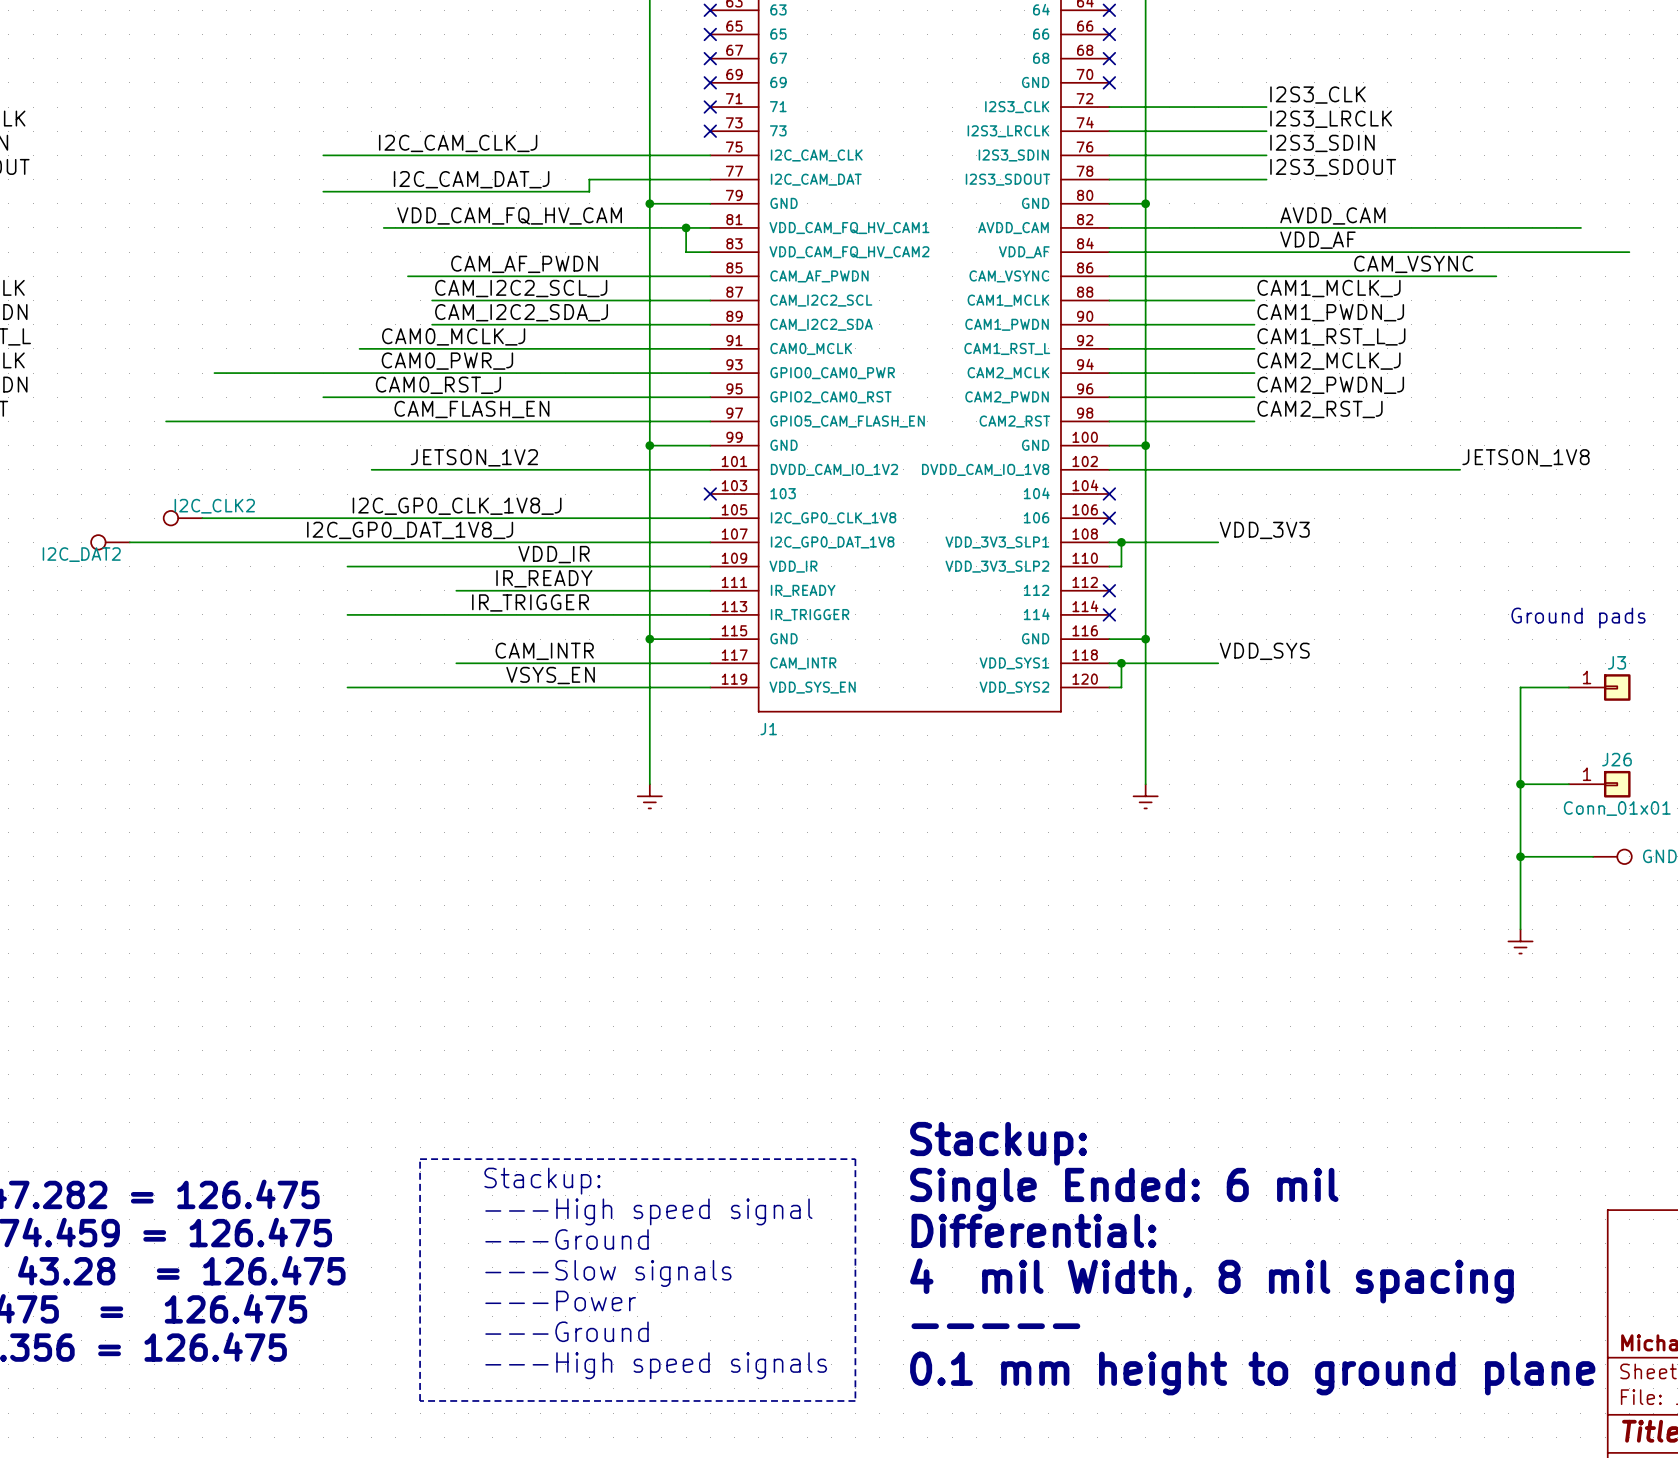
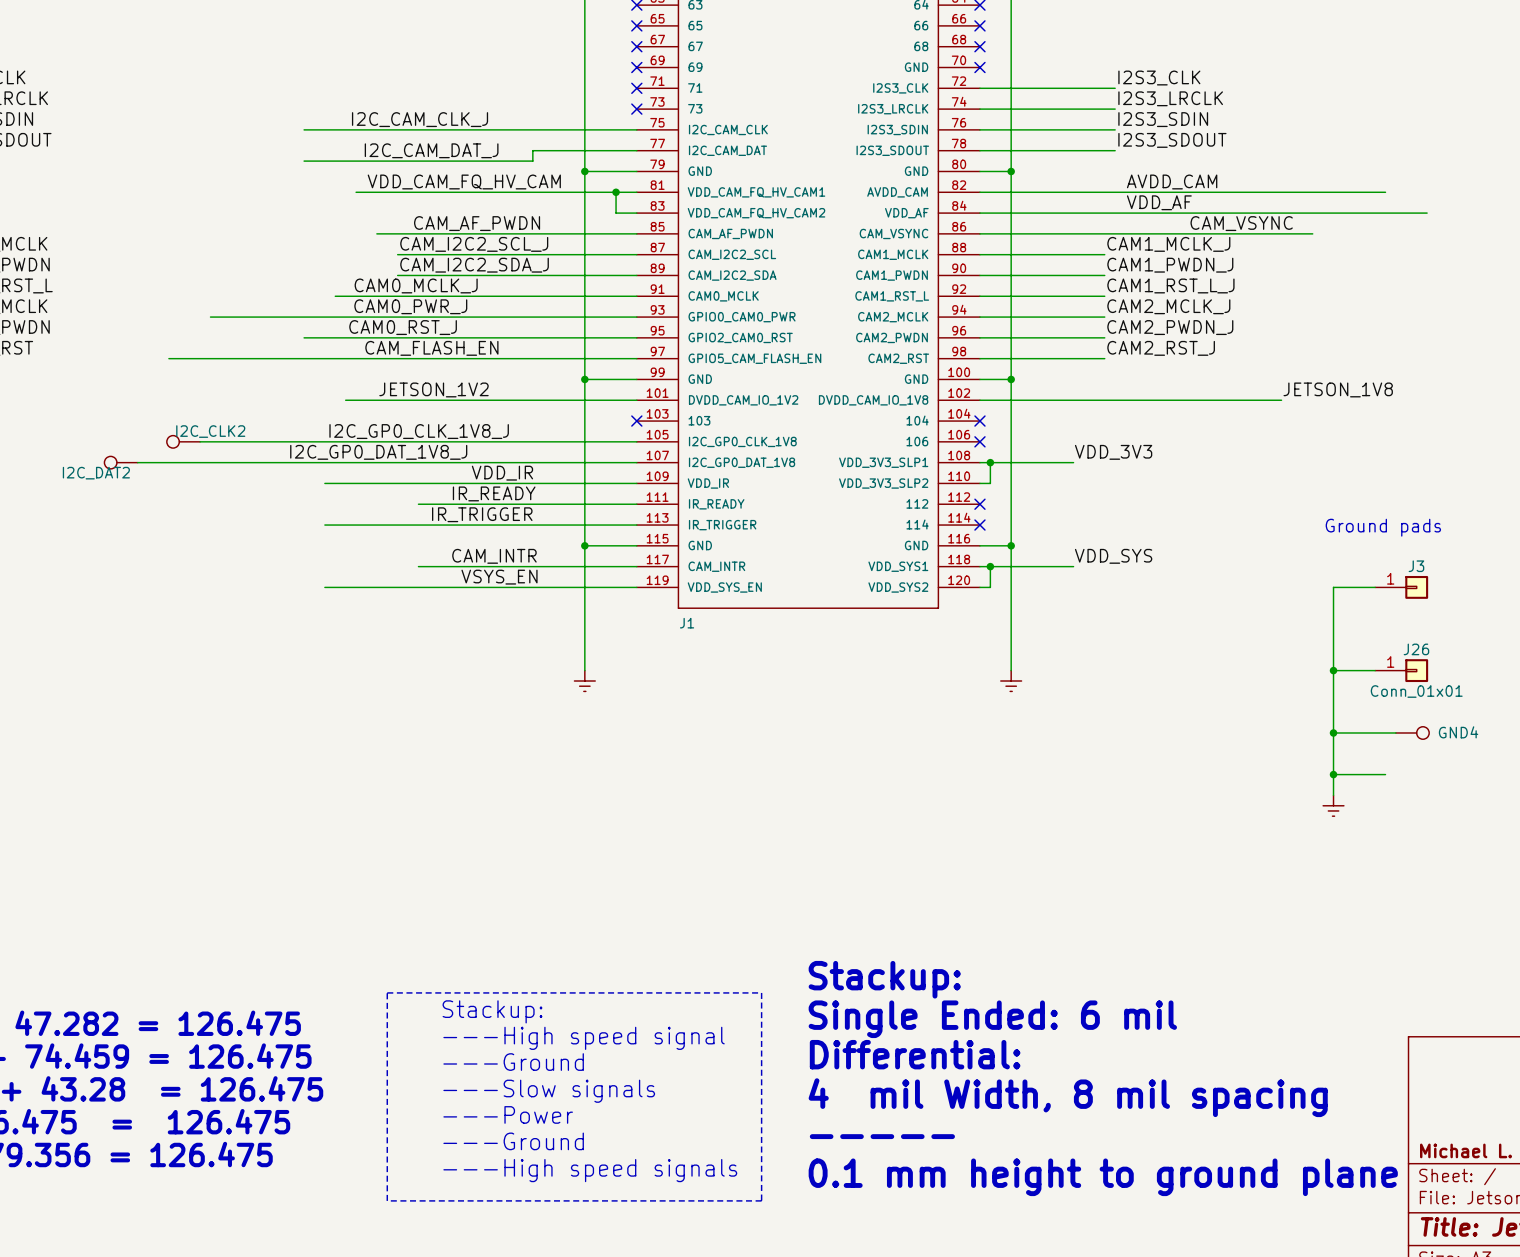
wire: none -> (1333, 774) (1385, 774)
junction: none -> (1333, 774)

